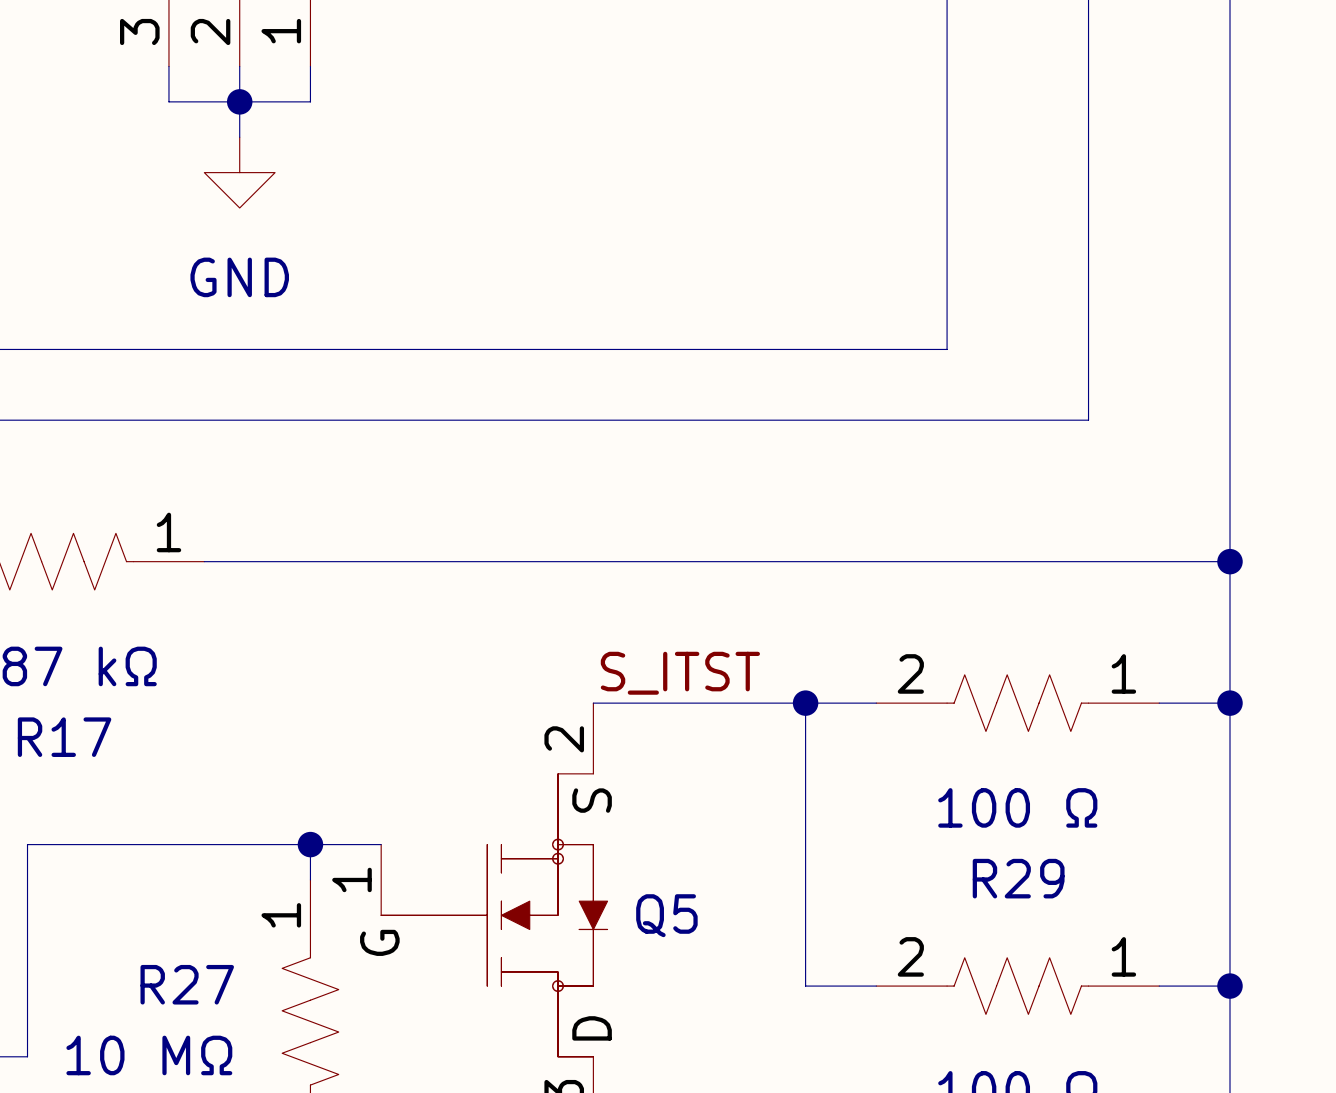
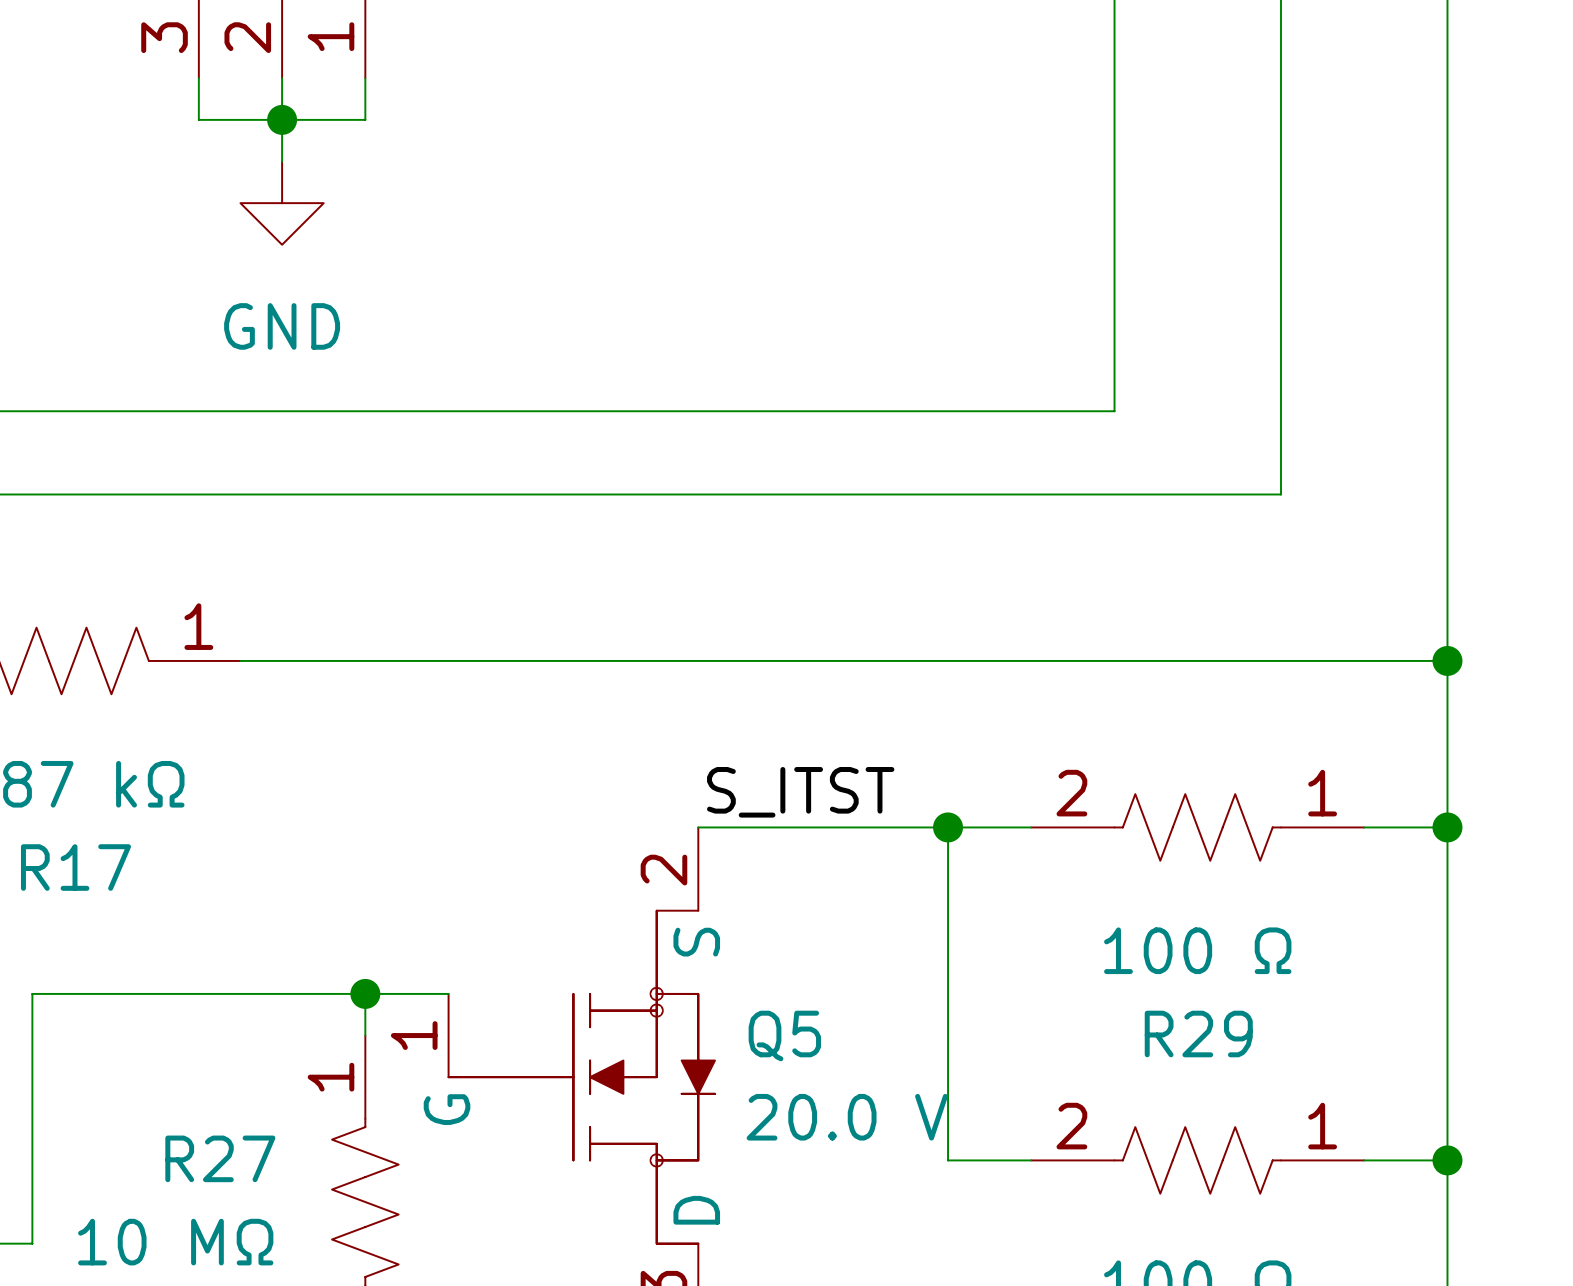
Q5 name position: Q5 (666, 915) -> Q5 (784, 1035)
Q5 value: none -> 20.0 V (847, 1117)

